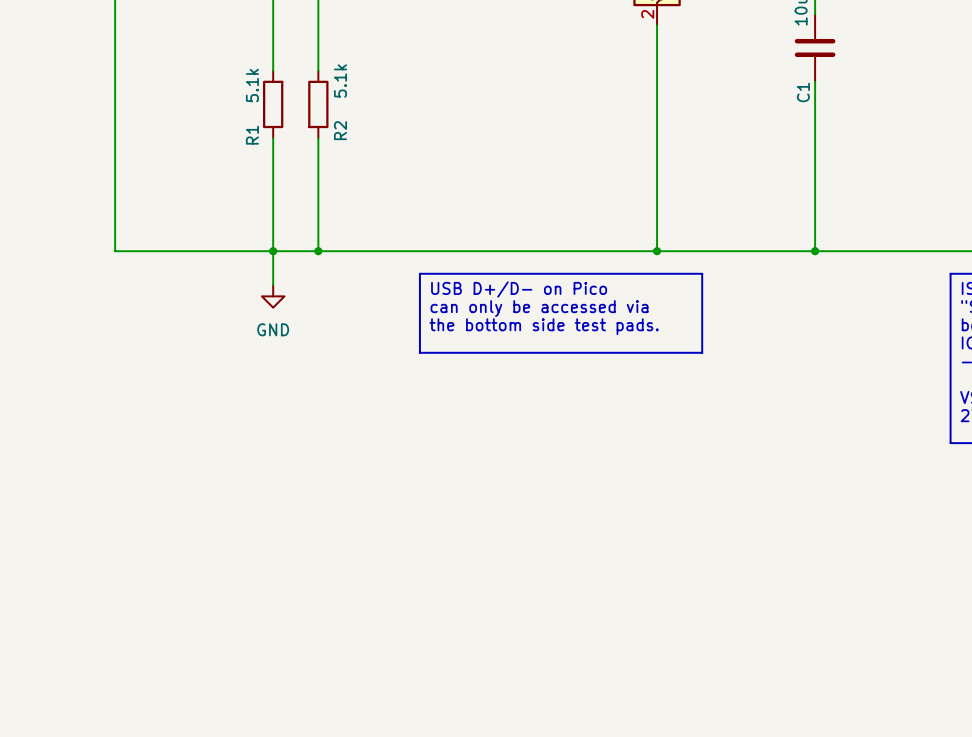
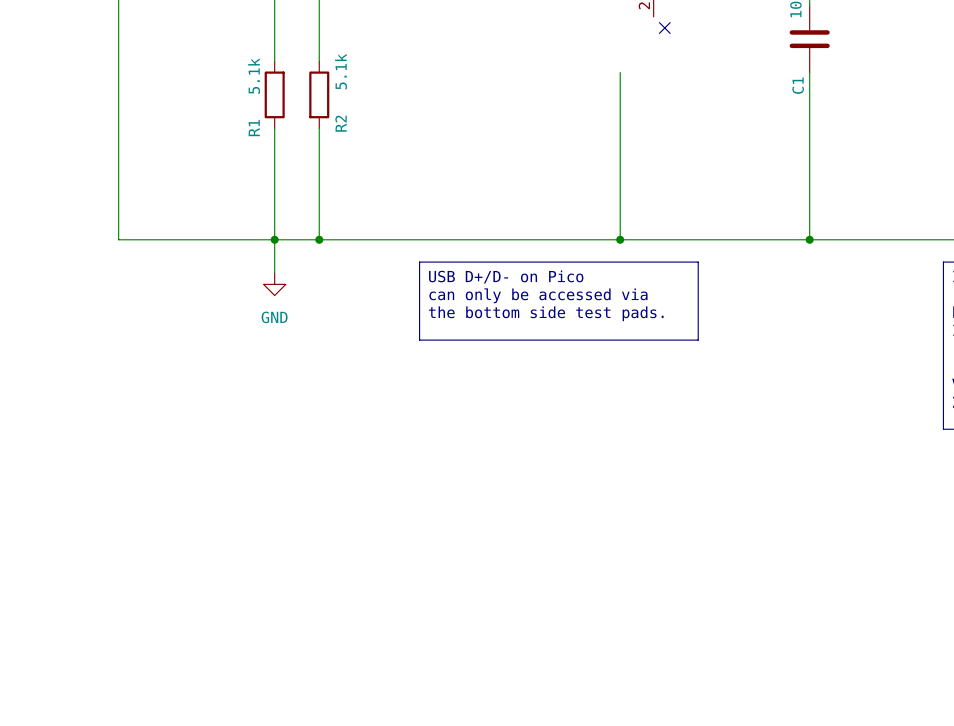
wire: (657, 25) (657, 251) -> none
no-connect mark: none -> (664, 28)
wire: none -> (620, 72) (620, 239)
junction position: (657, 251) -> (620, 239)

